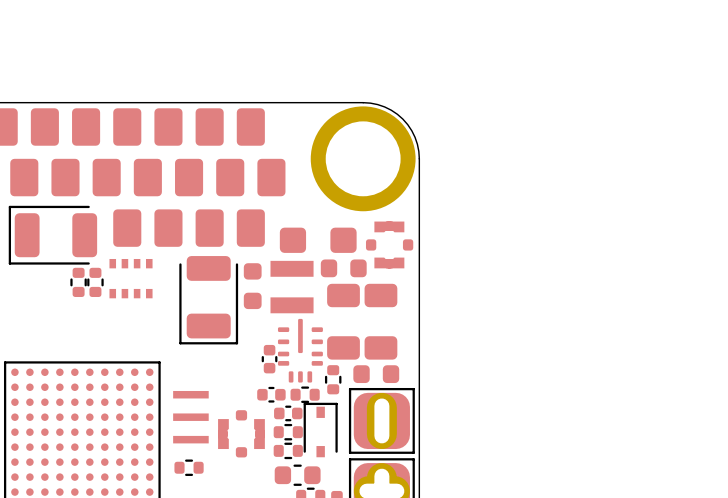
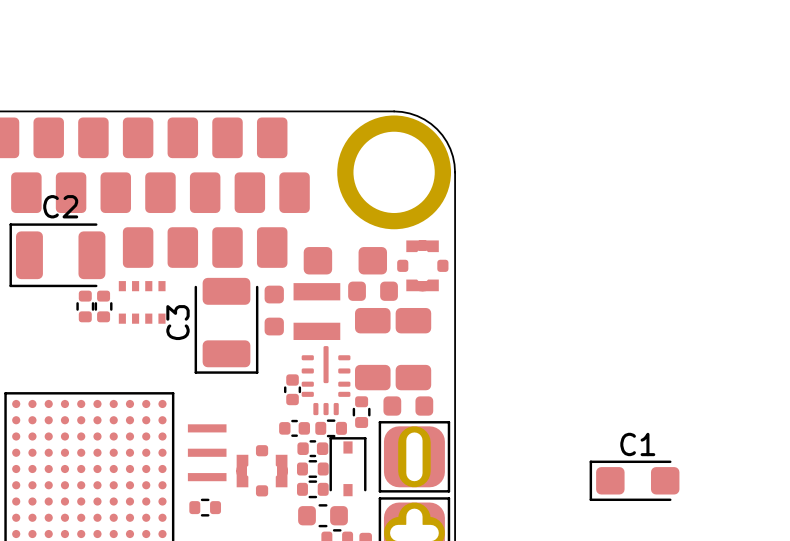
C2 name: none -> C2 (60, 206)
C3 name: none -> C3 (177, 322)
C1: none -> (634, 480)

